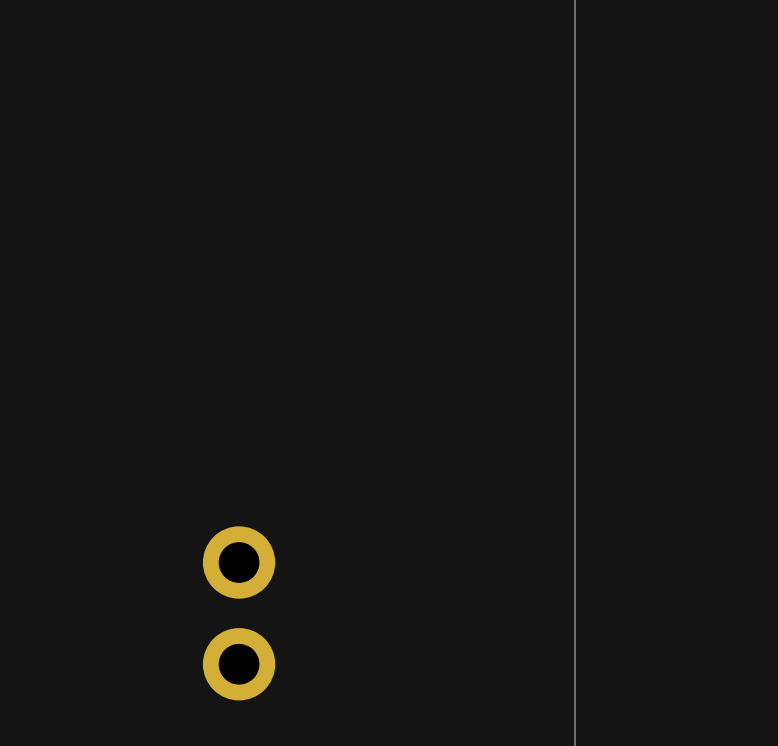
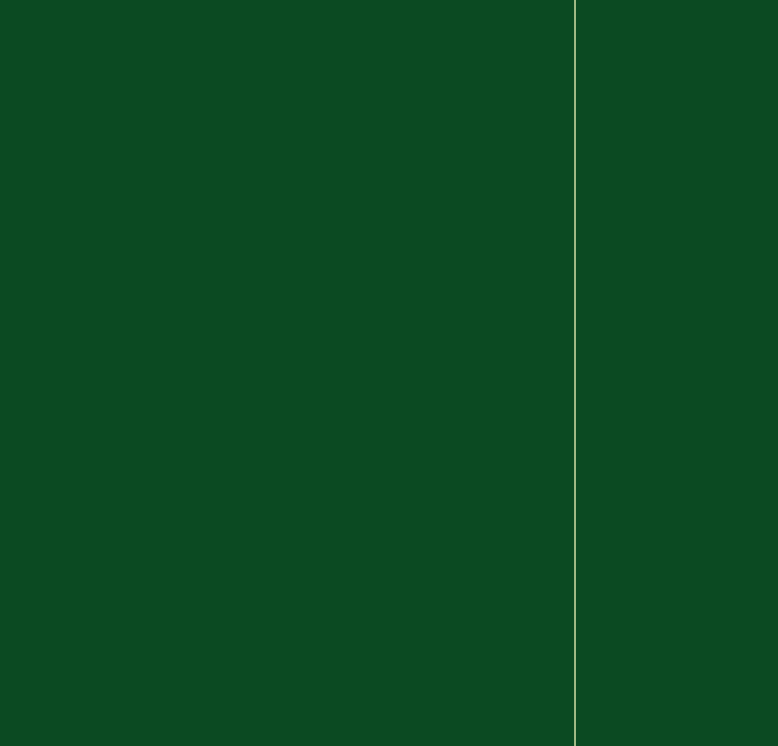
part: (239, 613) -> none

